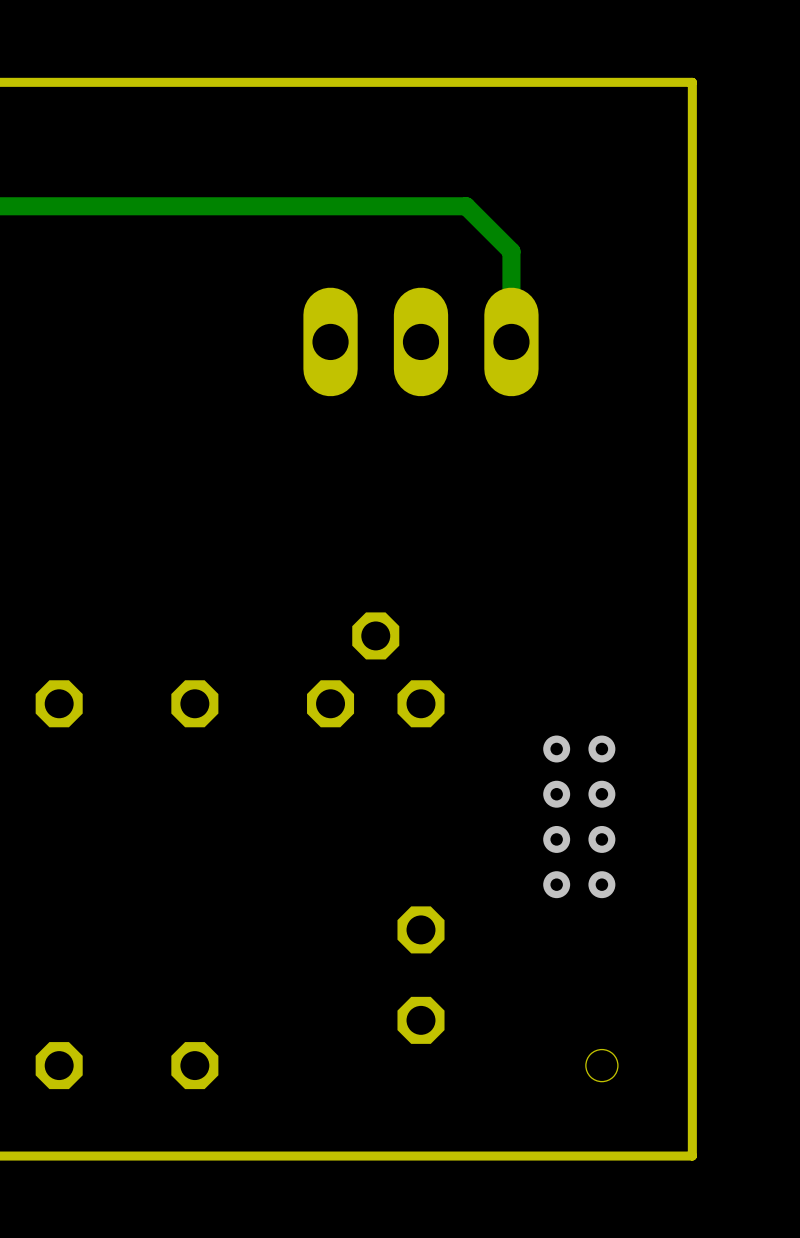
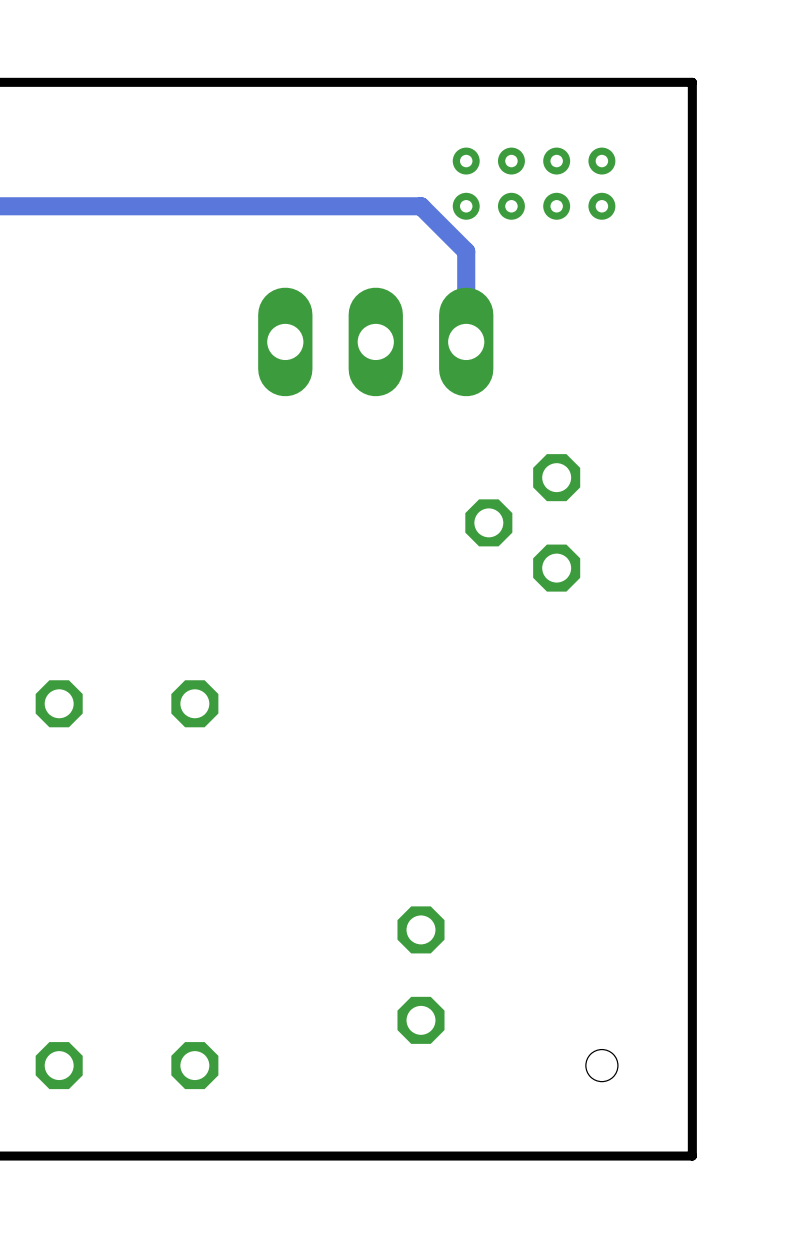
via: none -> (466, 161)
via: none -> (511, 161)
via: none -> (556, 161)
via: none -> (601, 161)
track: (420, 206) (466, 206) (511, 251) (511, 341) -> (420, 206) (466, 251) (466, 341)
via: none -> (466, 206)
via: none -> (511, 206)
via: none -> (556, 206)
via: none -> (601, 206)
part position: (420, 341) -> (375, 341)
part rotation: 0° (375, 669) -> 90° counterclockwise (522, 522)
part position: (375, 669) -> (522, 522)
via: (556, 749) -> none
via: (601, 749) -> none
via: (556, 794) -> none
via: (601, 794) -> none
via: (556, 839) -> none
via: (601, 839) -> none
via: (556, 884) -> none
via: (601, 884) -> none

